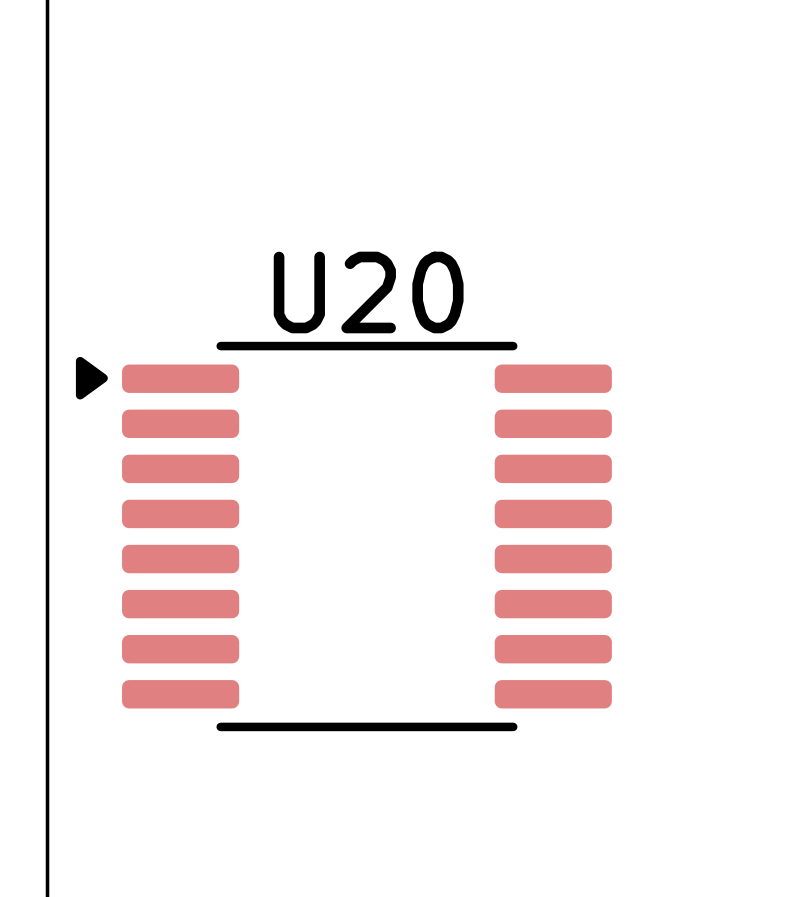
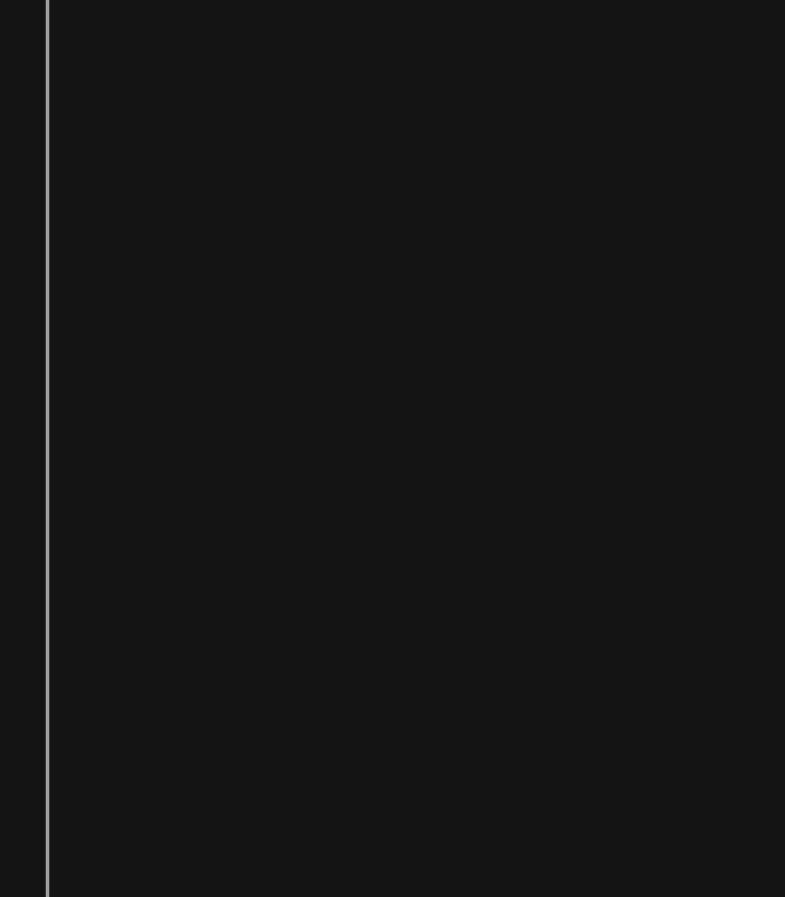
U20: (343, 536) -> none

